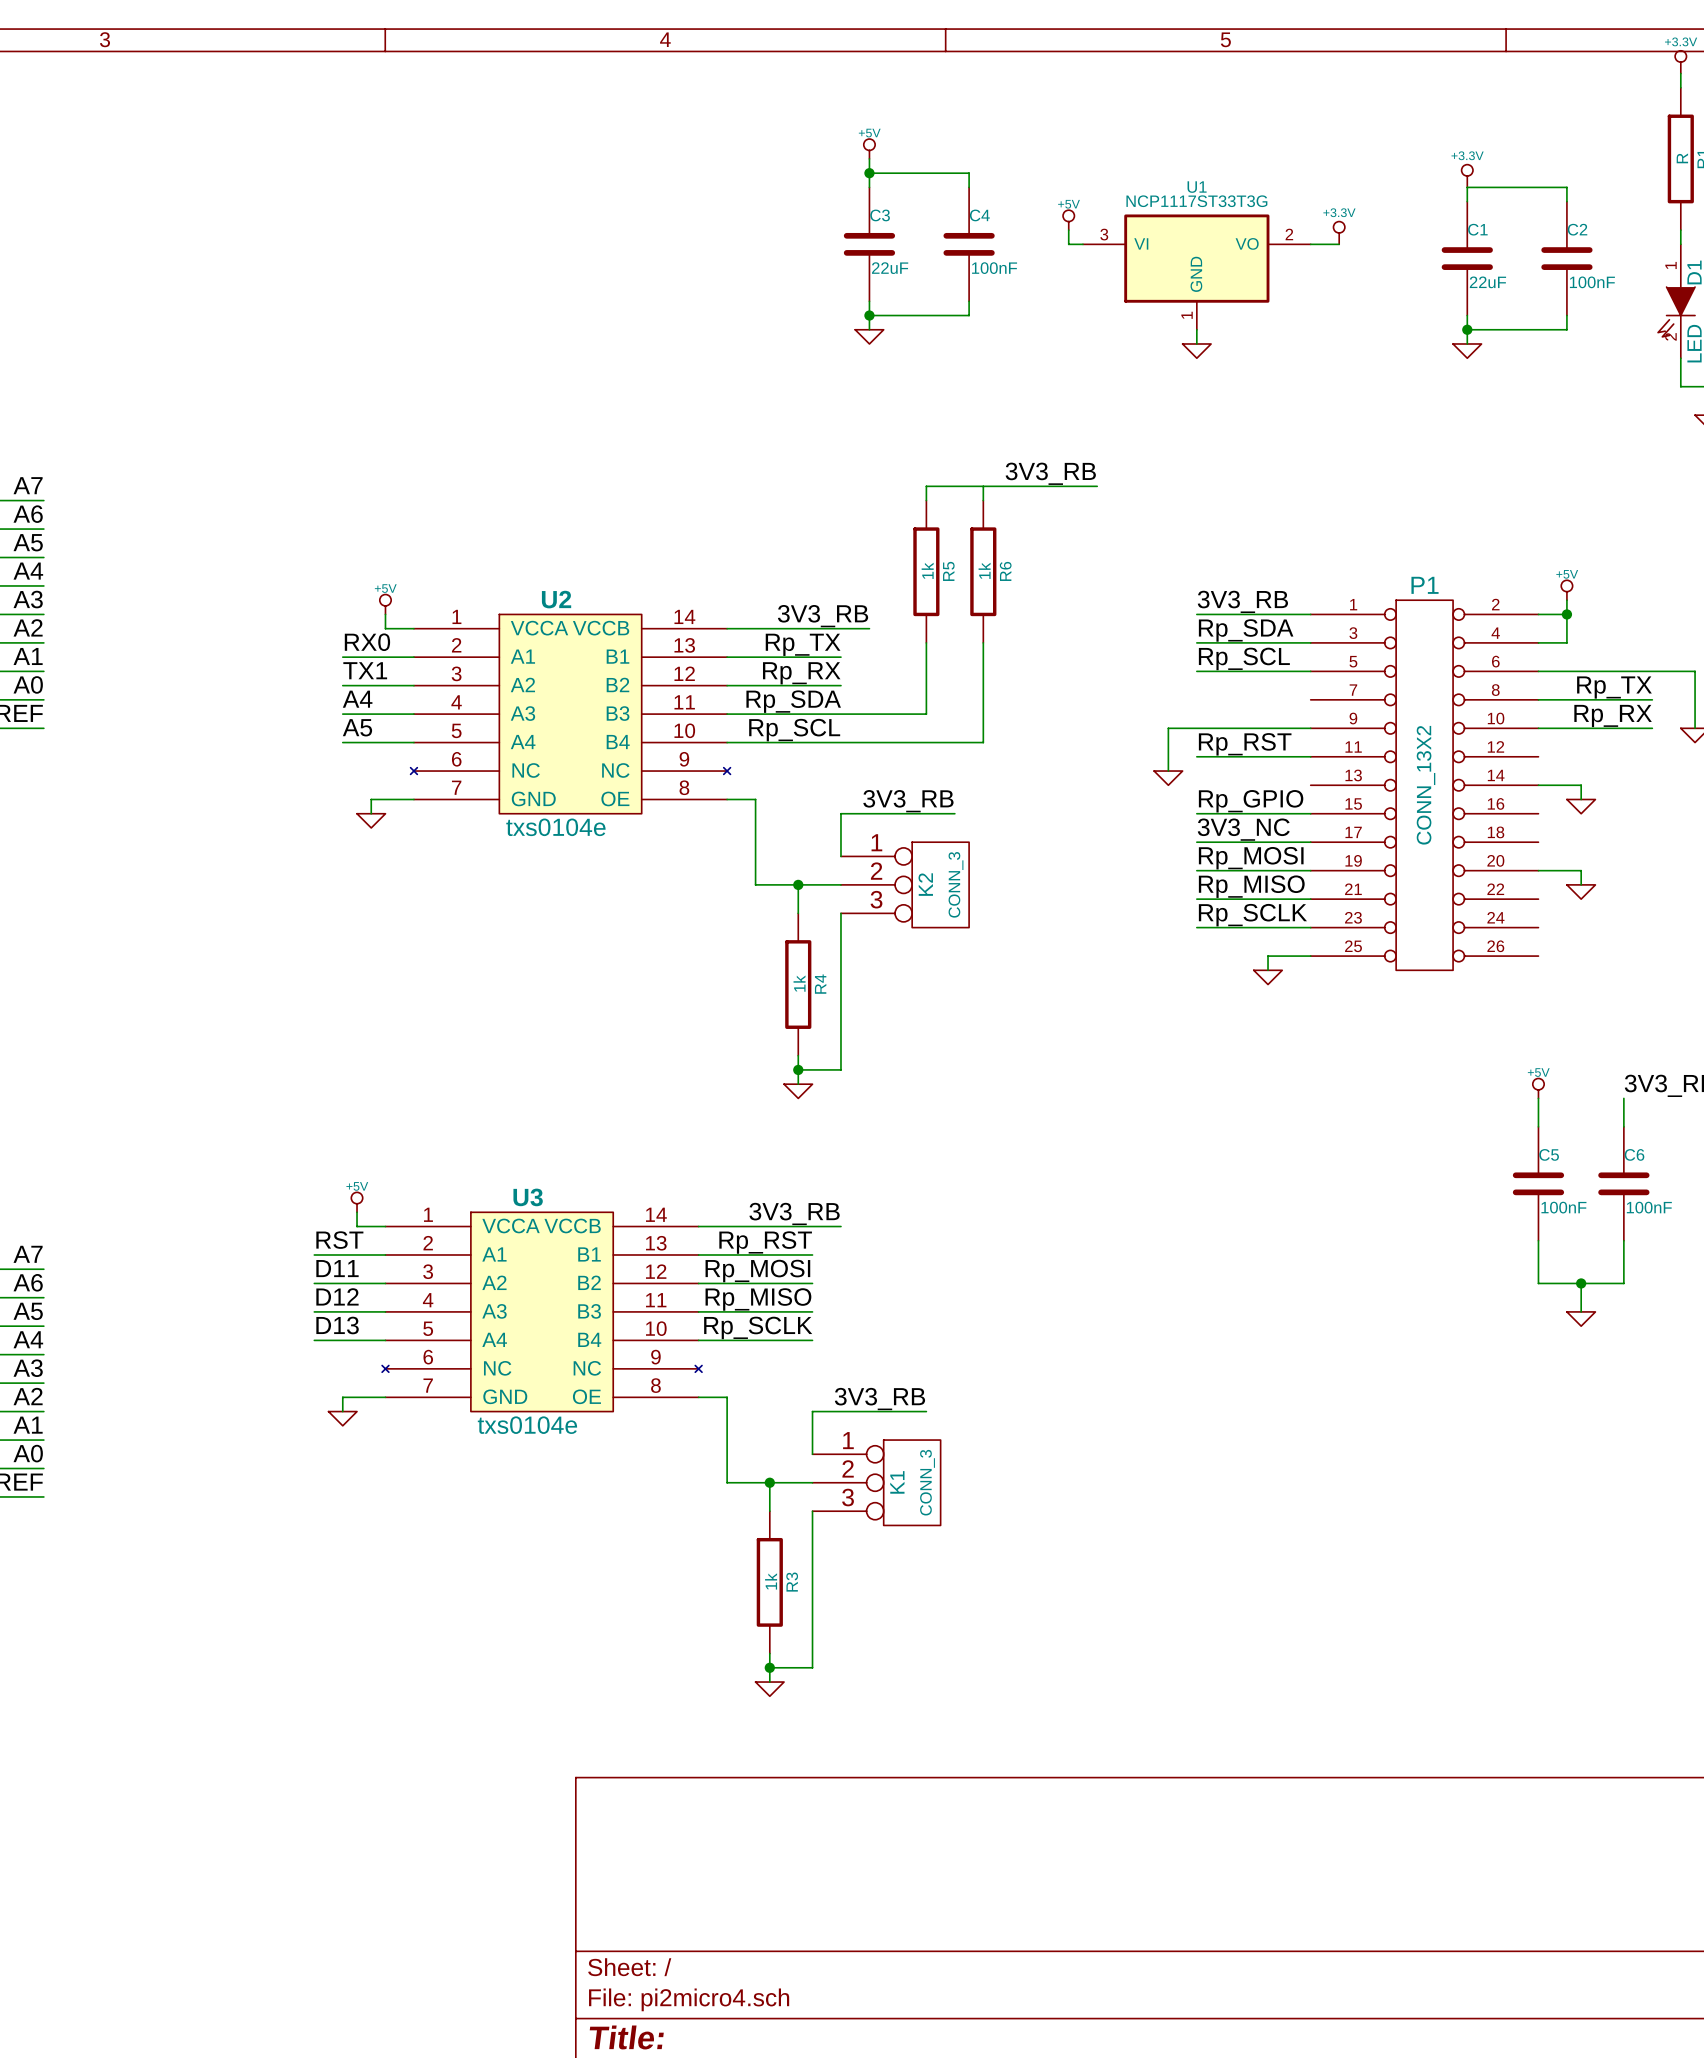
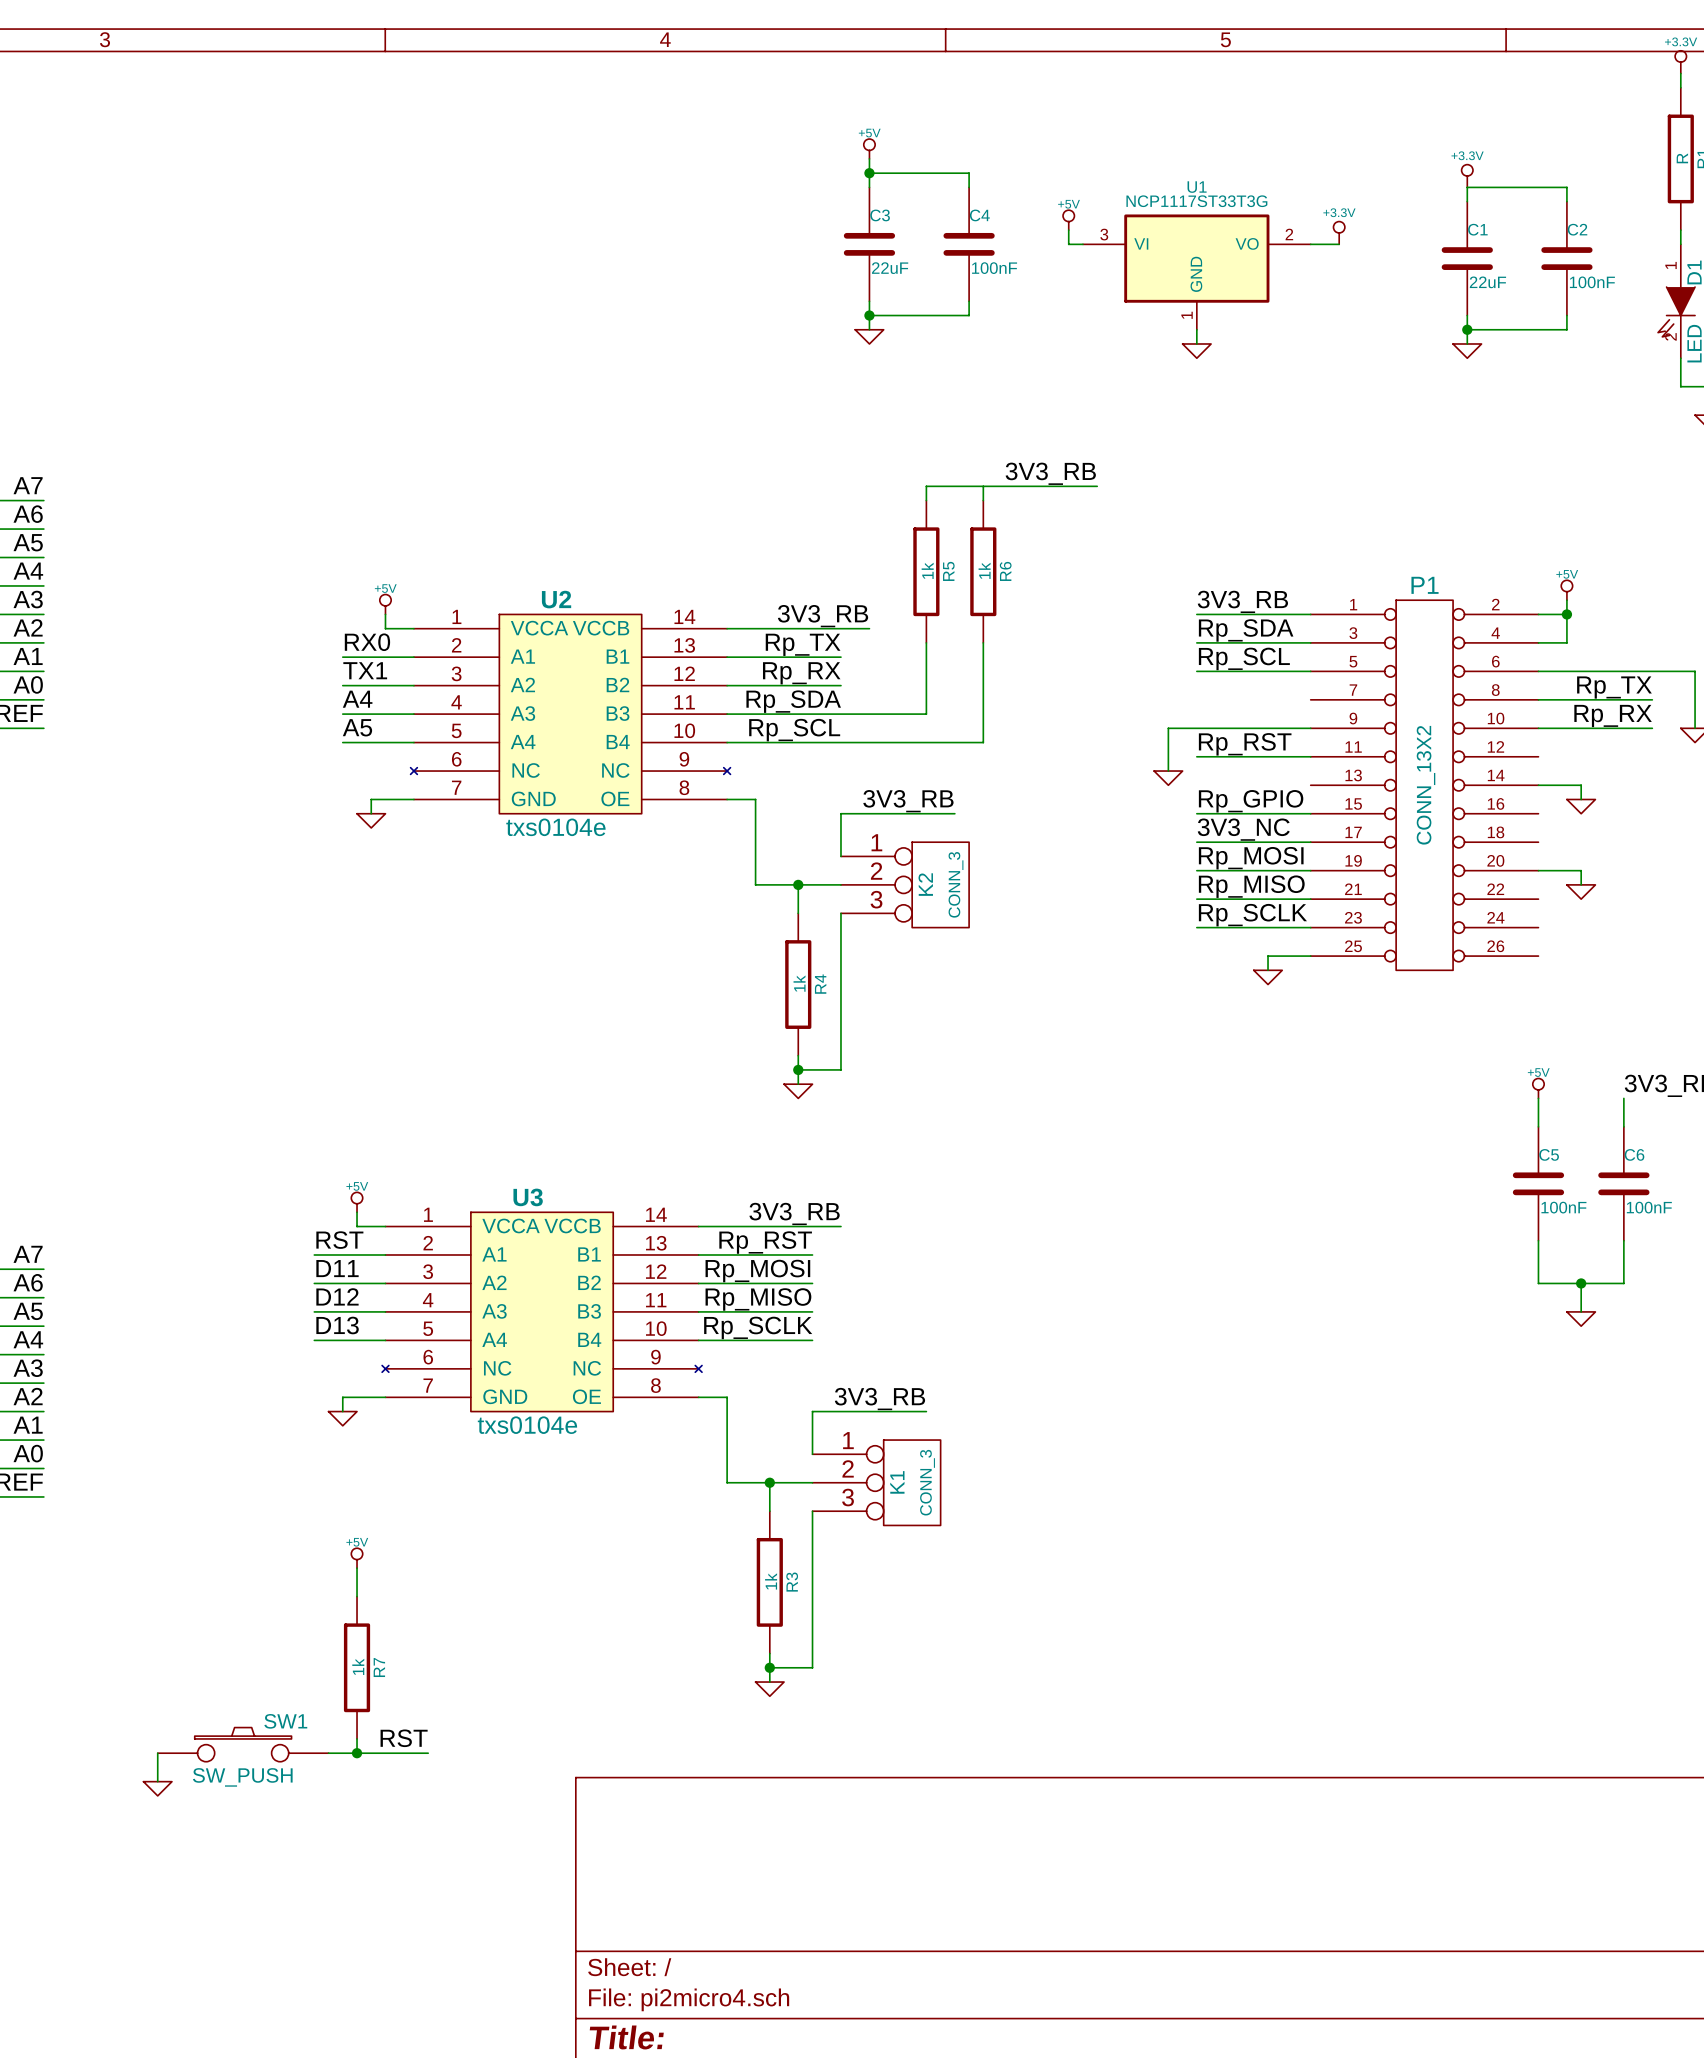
power symbol: none -> +5V (357, 1558)
wire: none -> (357, 1568) (357, 1596)
R7: none -> 1k (357, 1667)
wire: none -> (357, 1738) (357, 1753)
label: none -> RST (404, 1738)
SW1: none -> SW_PUSH (243, 1744)
wire: none -> (157, 1753) (157, 1781)
wire: none -> (328, 1753) (428, 1753)
junction: none -> (357, 1753)
power symbol: none -> (157, 1788)

